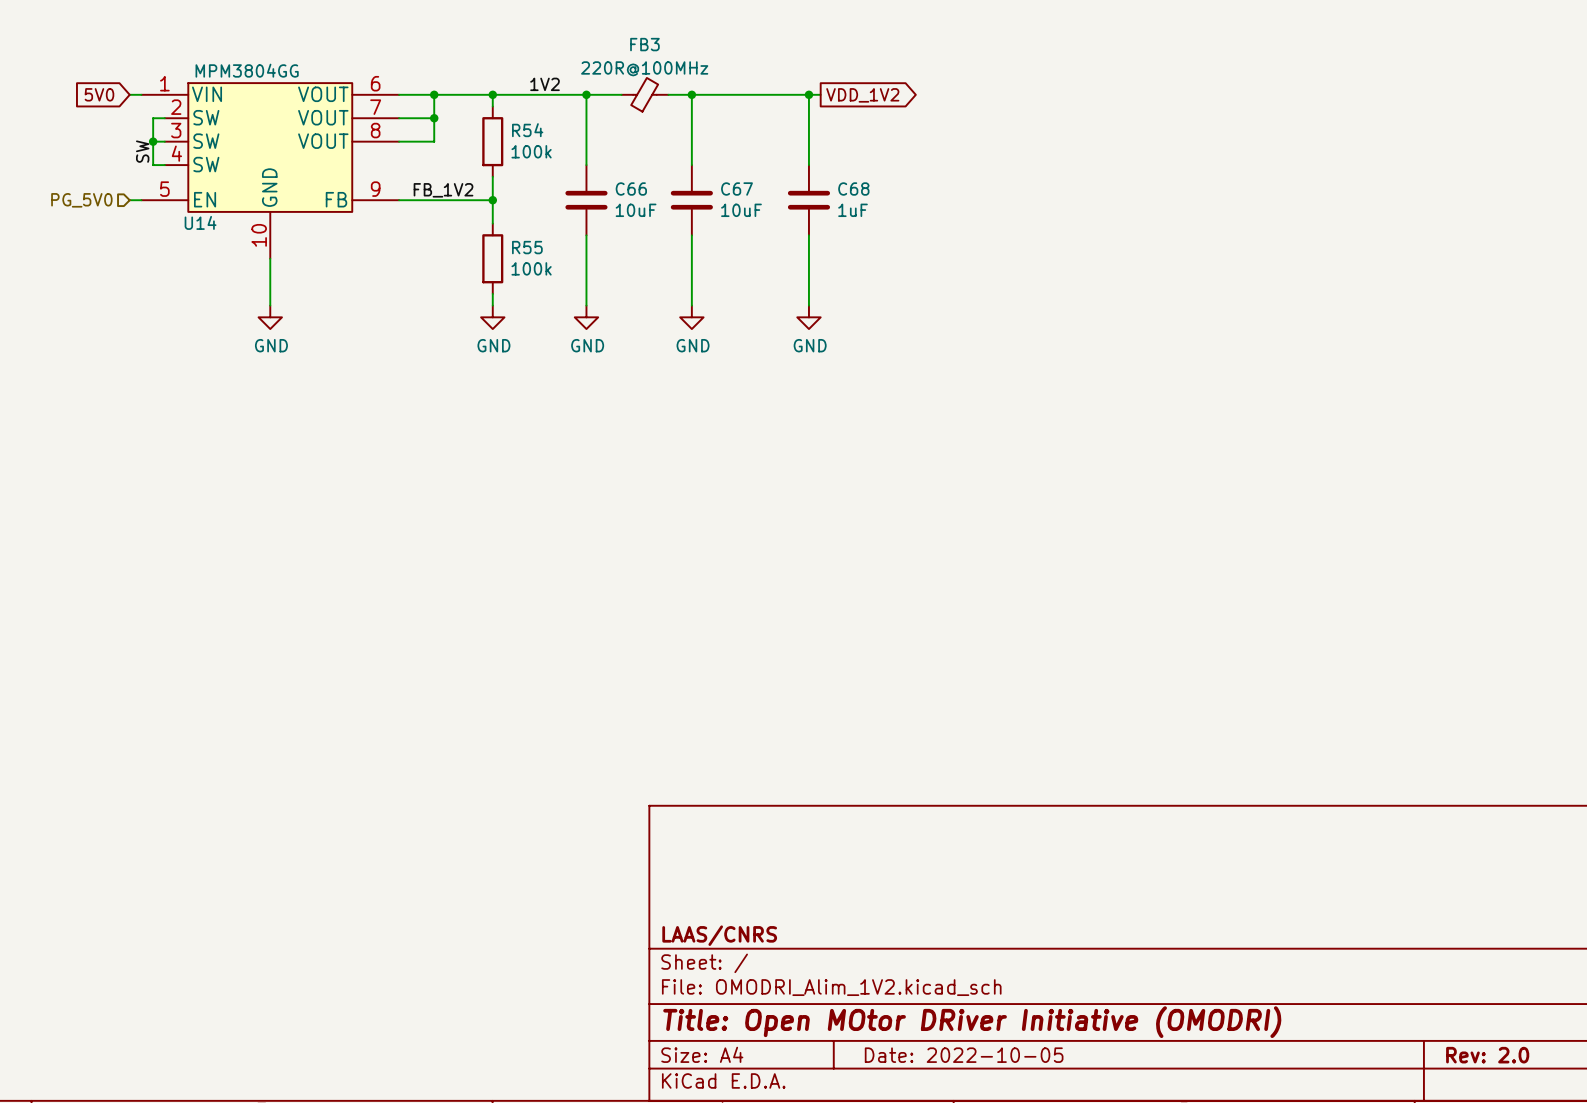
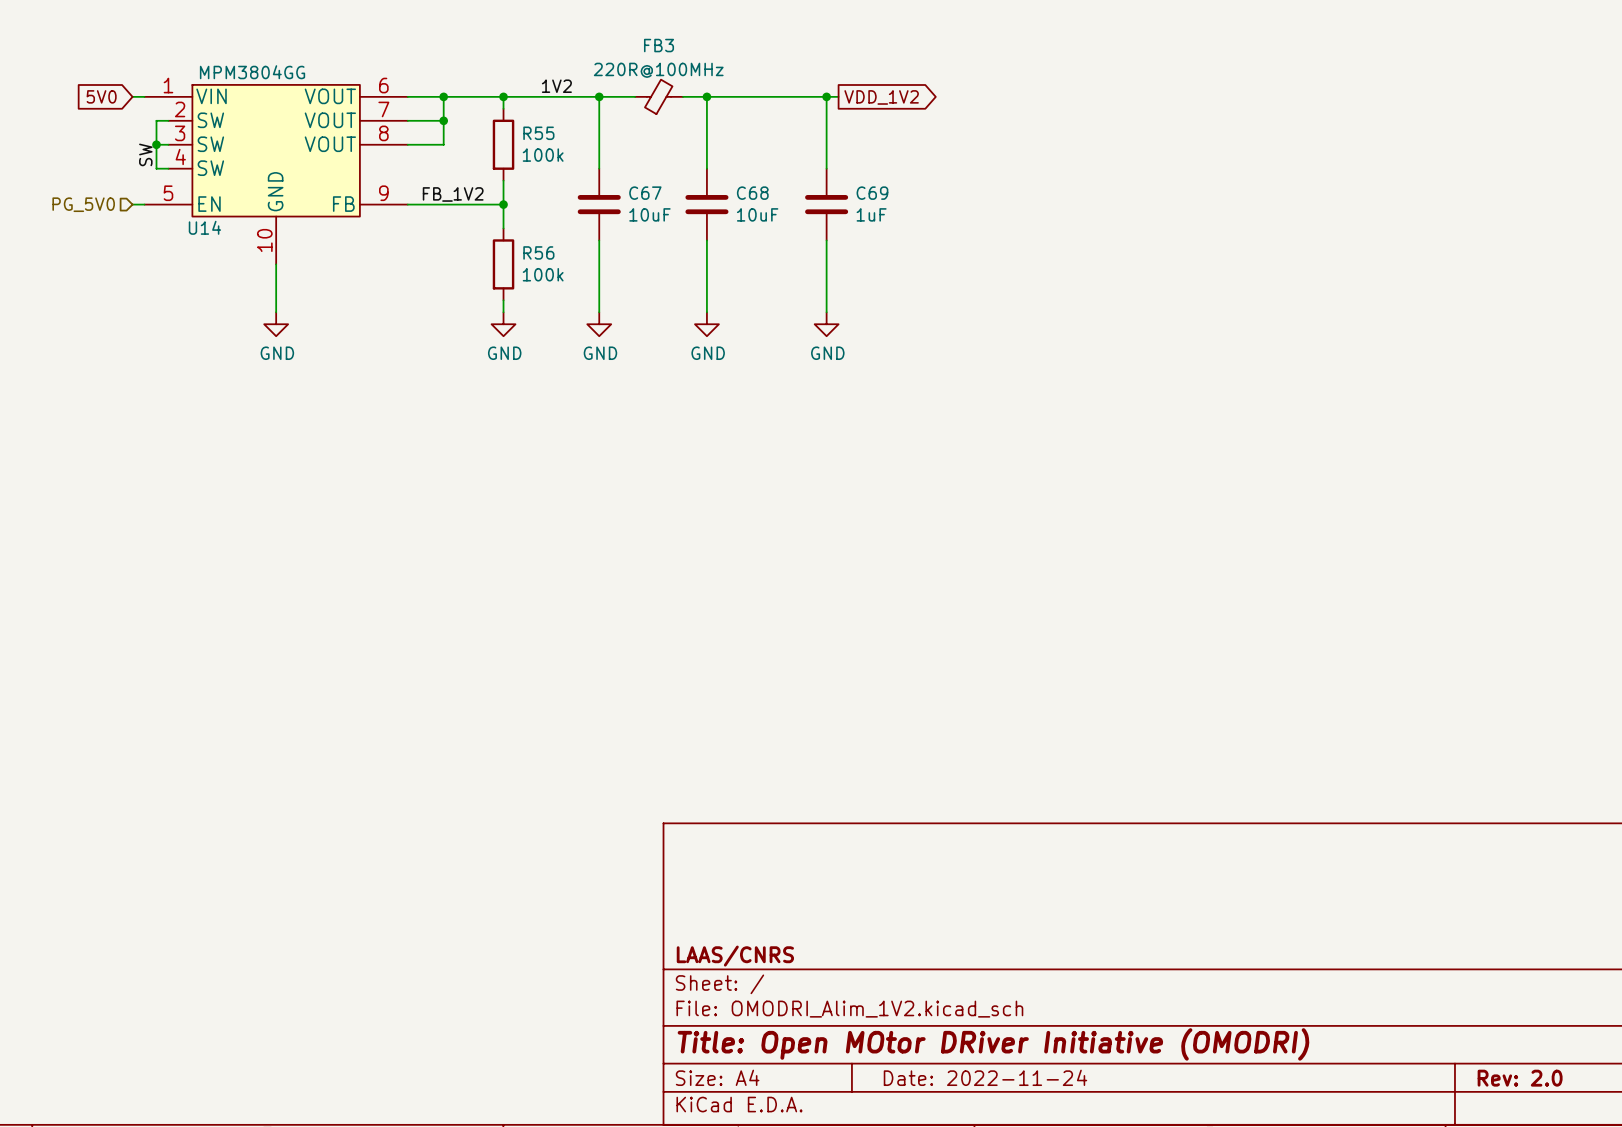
R54 name: R54 (527, 130) -> R55 (538, 133)
C66 name: C66 (631, 189) -> C67 (645, 193)
C67 name: C67 (737, 189) -> C68 (752, 193)
C68 name: C68 (853, 189) -> C69 (872, 193)
R55 name: R55 (527, 247) -> R56 (538, 252)
title block: Date: 2022-10-05 (964, 1055) -> Date: 2022-11-24 (985, 1077)

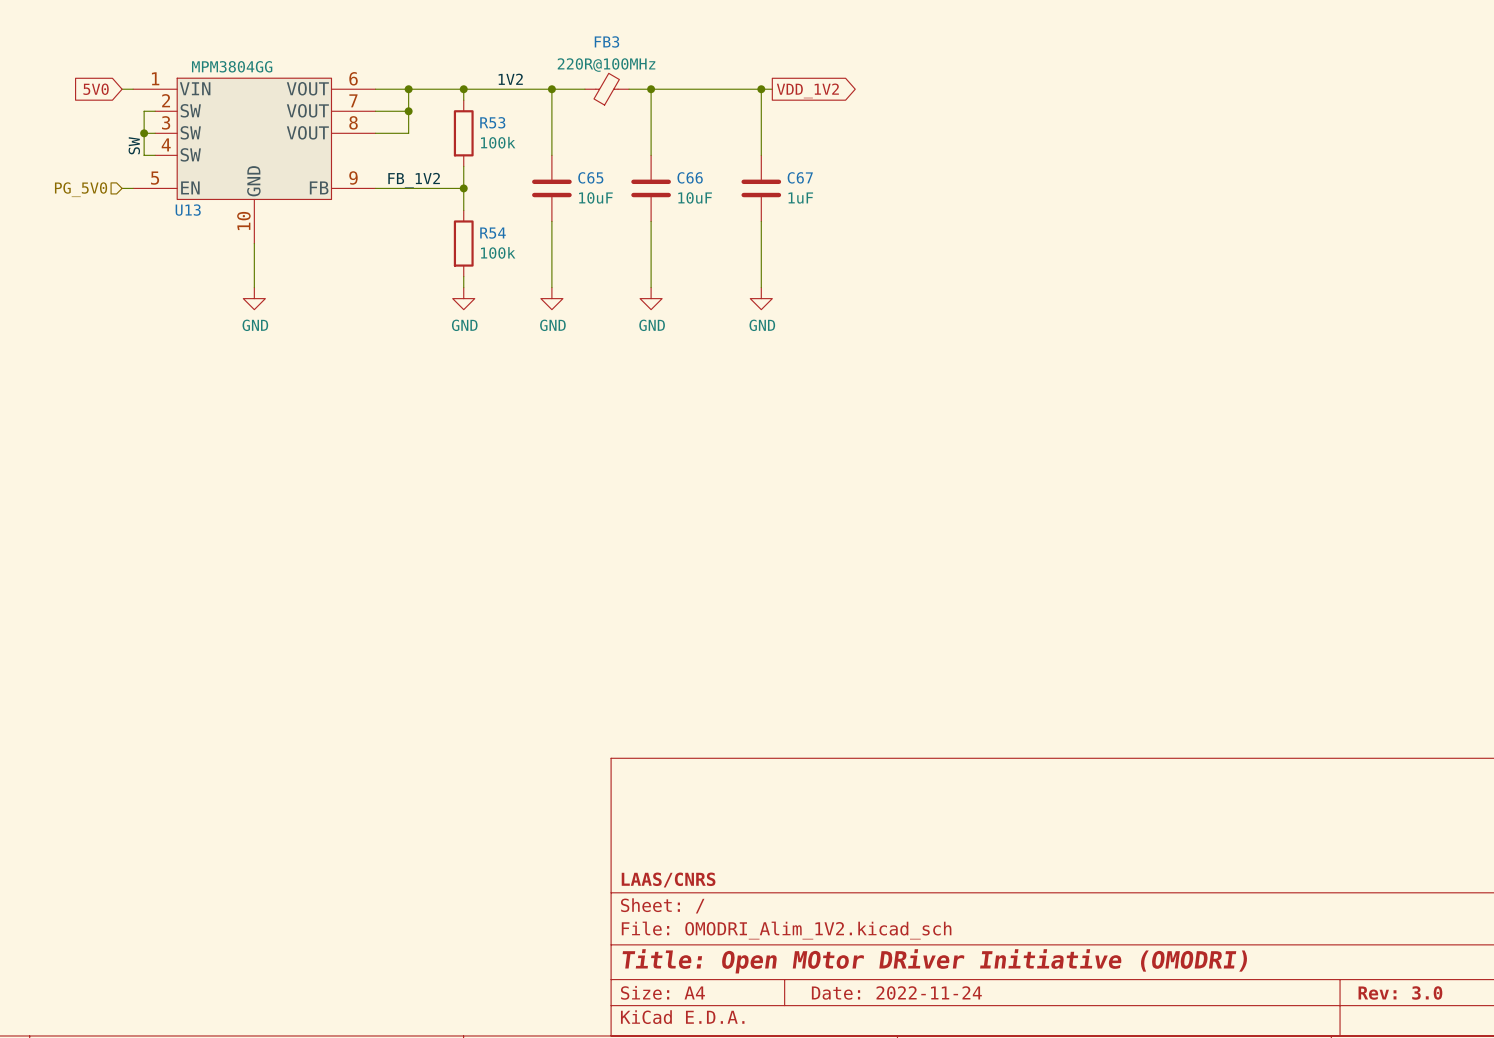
R55 name: R55 (538, 133) -> R53 (492, 122)
C67 name: C67 (645, 193) -> C65 (590, 177)
C68 name: C68 (752, 193) -> C66 (690, 177)
C69 name: C69 (872, 193) -> C67 (800, 177)
U14 name: U14 (204, 227) -> U13 (188, 210)
R56 name: R56 (538, 252) -> R54 (492, 233)
title block: Rev: 2.0 (1520, 1078) -> Rev: 3.0 (1400, 992)

